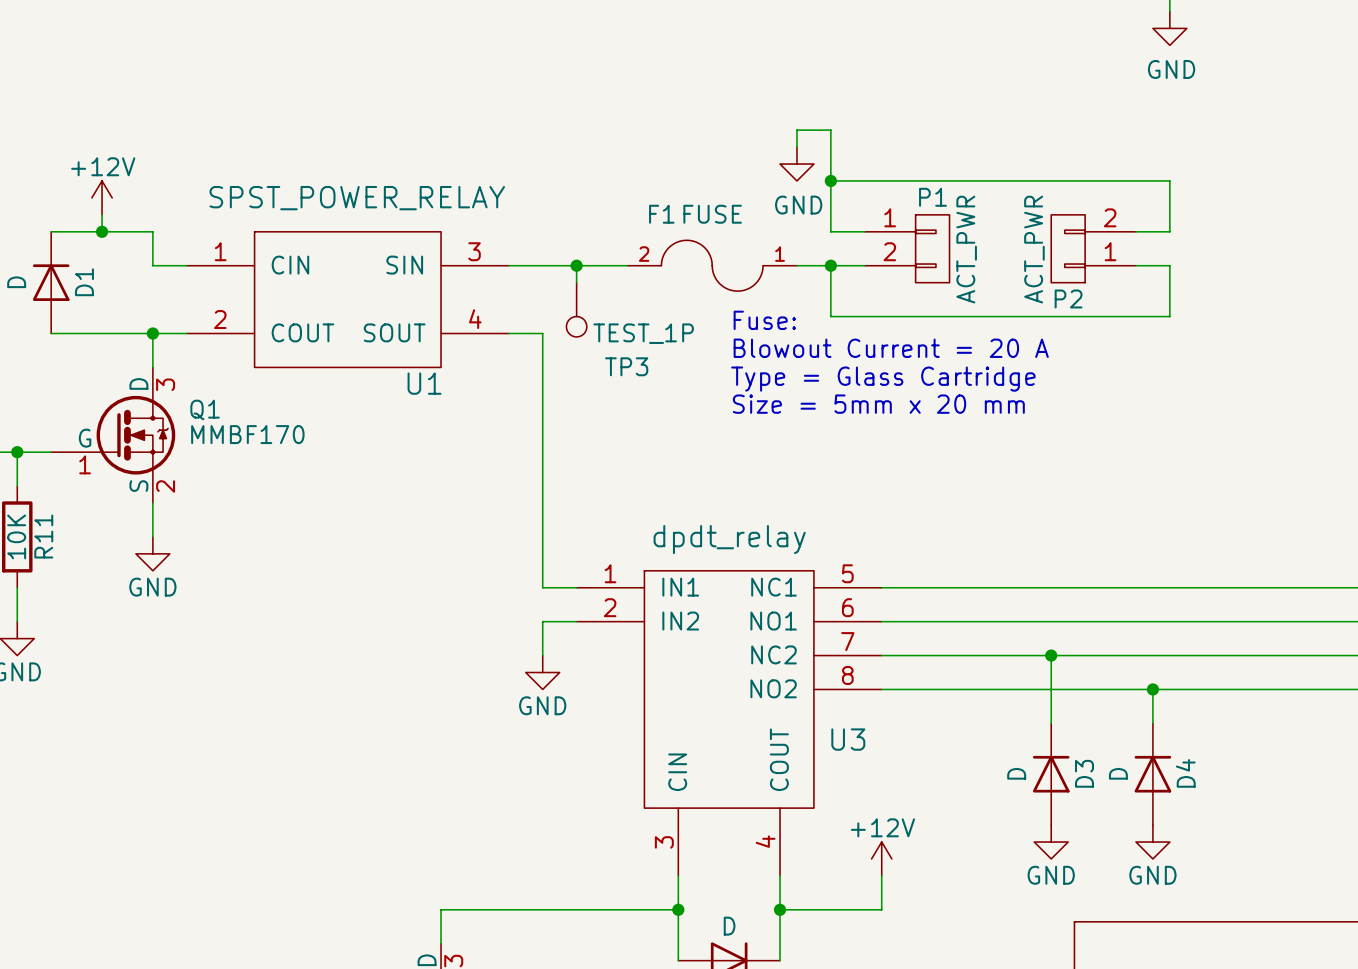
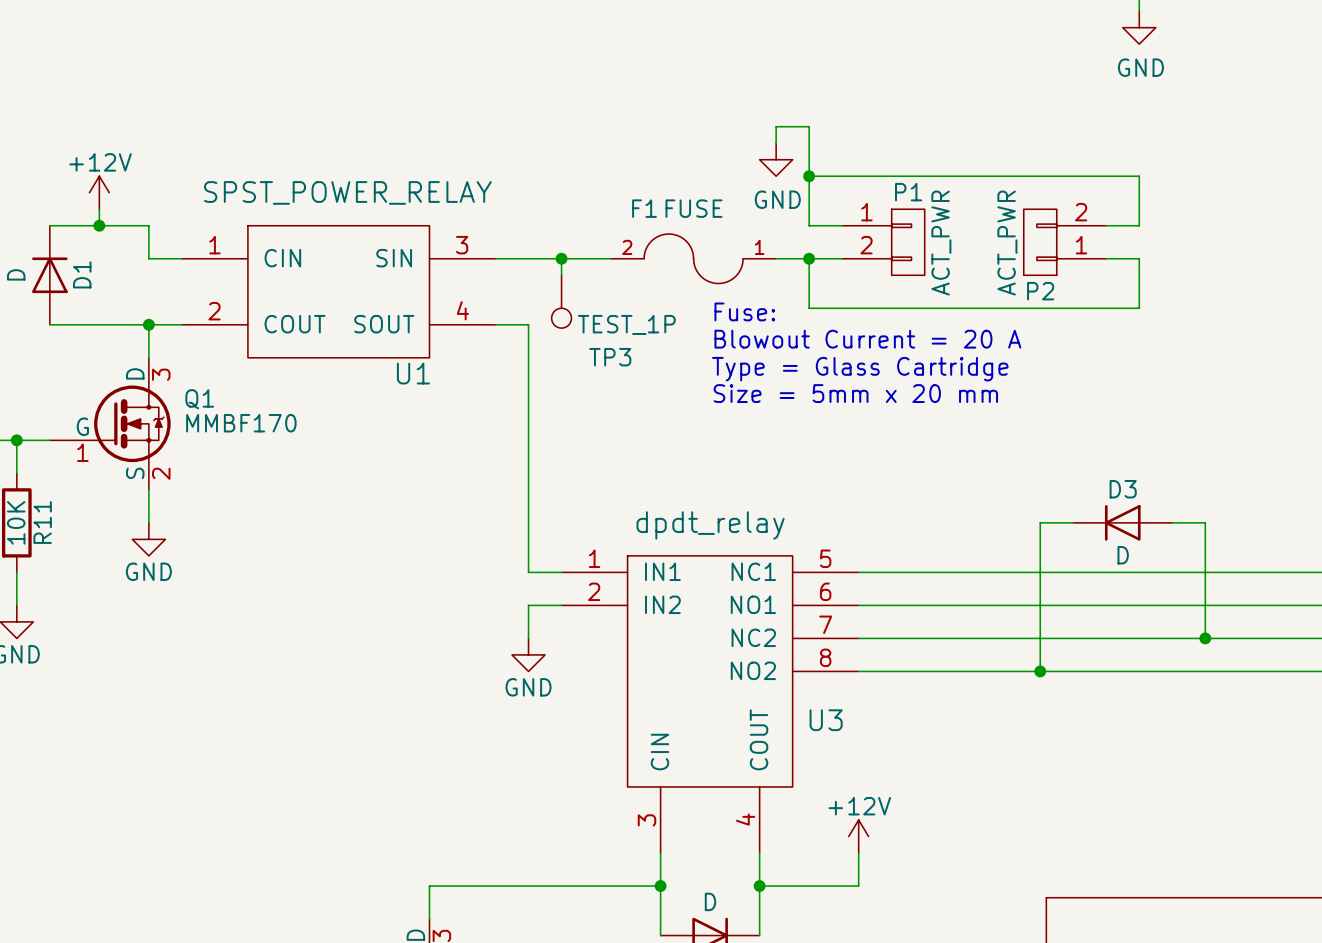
wire: none -> (1073, 522) (1040, 522) (1040, 671)
wire: none -> (1172, 522) (1205, 522) (1205, 638)
wire: (1051, 655) (1051, 723) -> none
junction position: (1051, 655) -> (1040, 671)
junction: none -> (1205, 638)
wire: (1152, 689) (1152, 723) -> none
junction: (1152, 689) -> none
D3 rotation: 0° (1051, 774) -> 90° counterclockwise (1122, 522)
D3 position: (1051, 774) -> (1122, 522)
D4: D (1152, 774) -> none
power symbol: GND (1051, 842) -> none
power symbol: GND (1152, 842) -> none

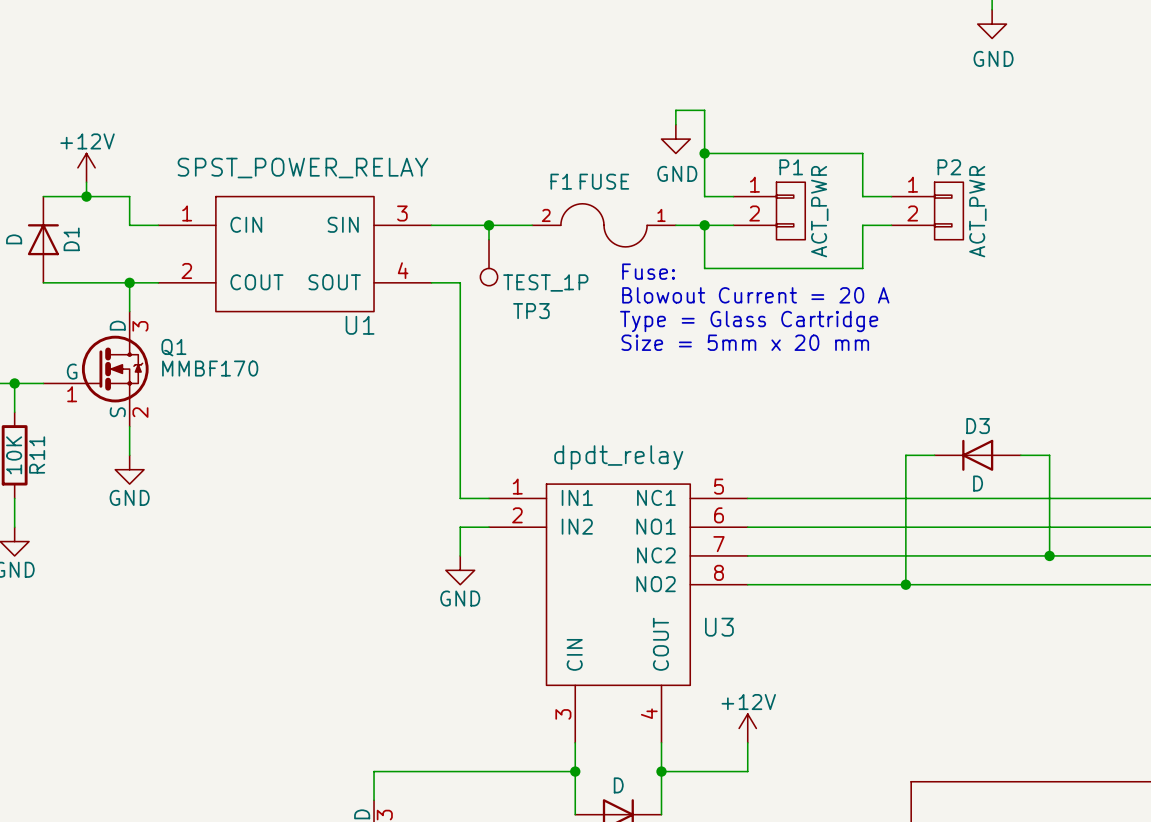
wire: (990, 176) (1139, 176) (1139, 225) (1106, 225) -> (862, 153) (862, 196) (891, 196)
P2 rotation: 0° (1040, 242) -> 180° (948, 210)
wire: (1106, 258) (1139, 258) (1139, 308) (990, 308) -> (891, 225) (862, 225) (862, 268)

